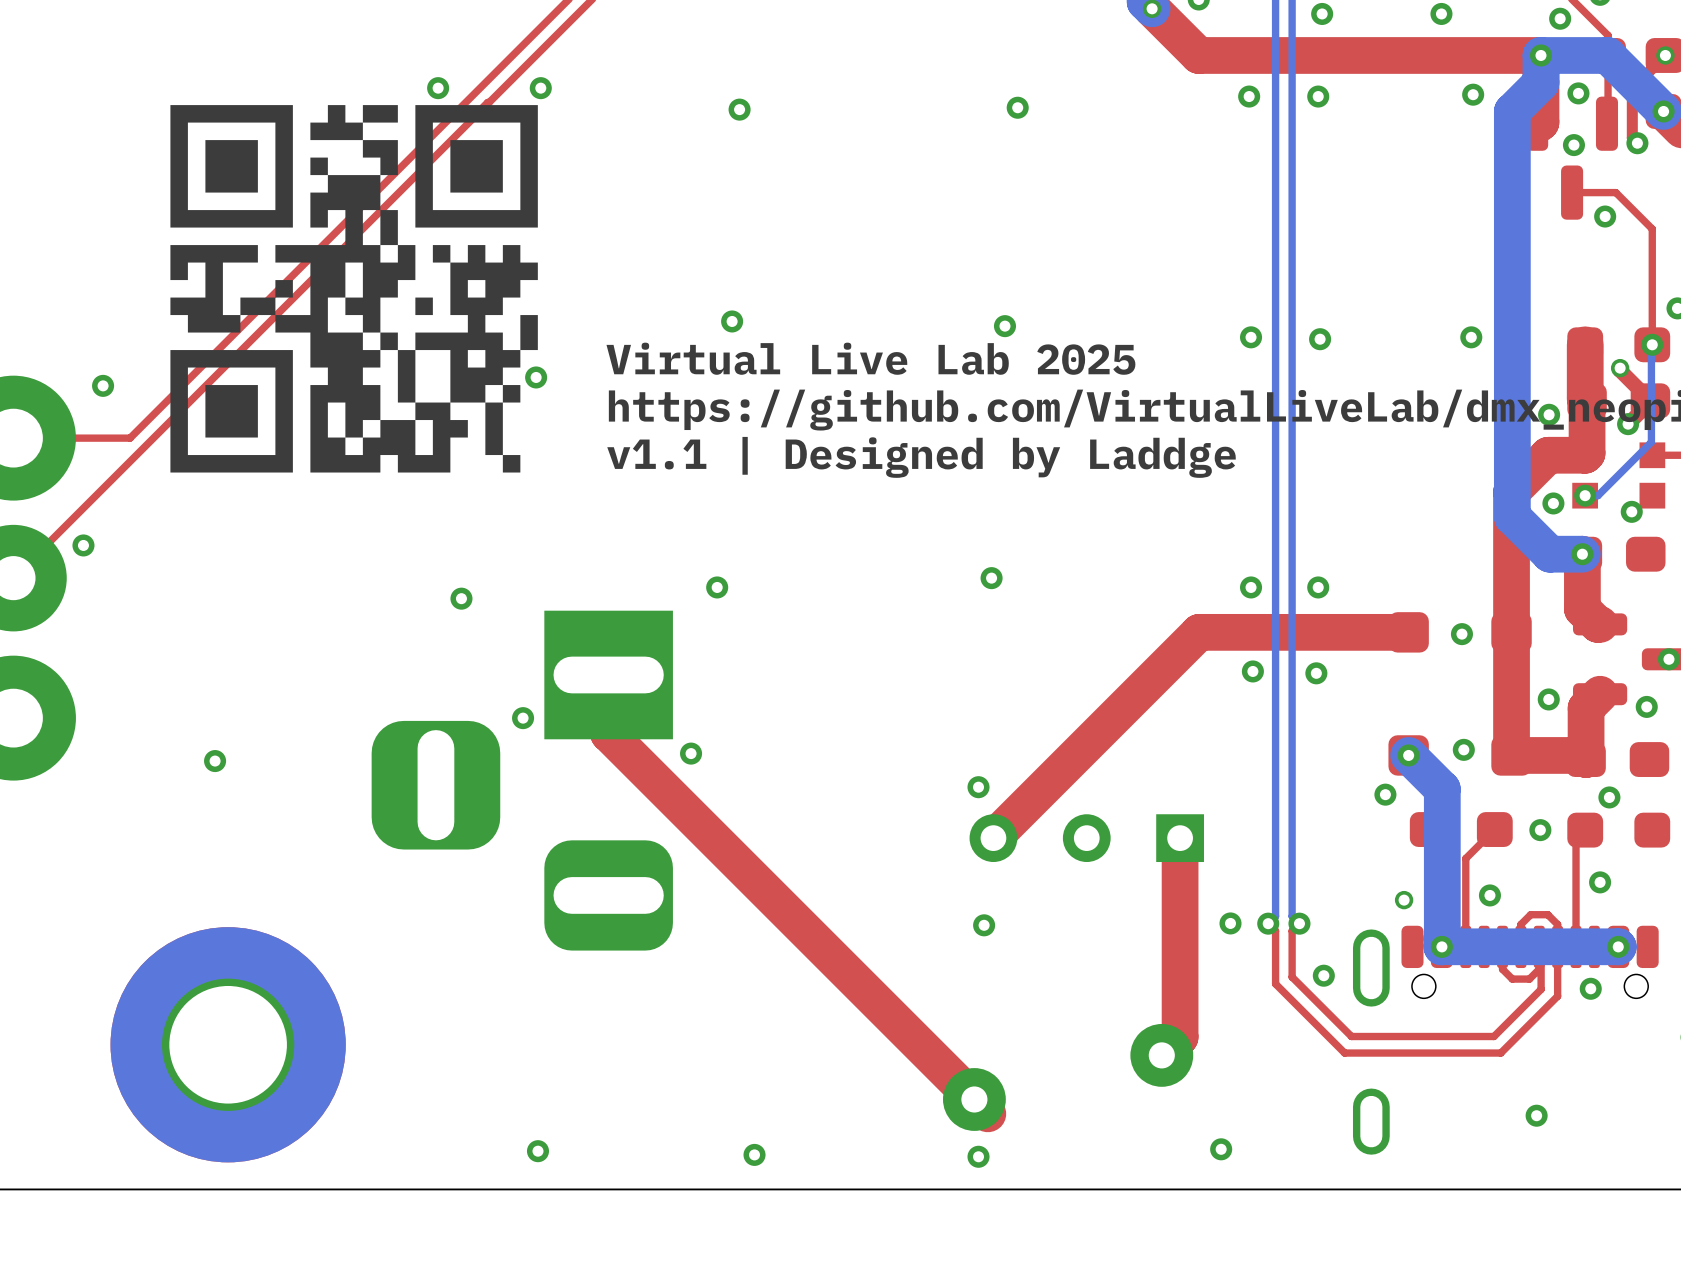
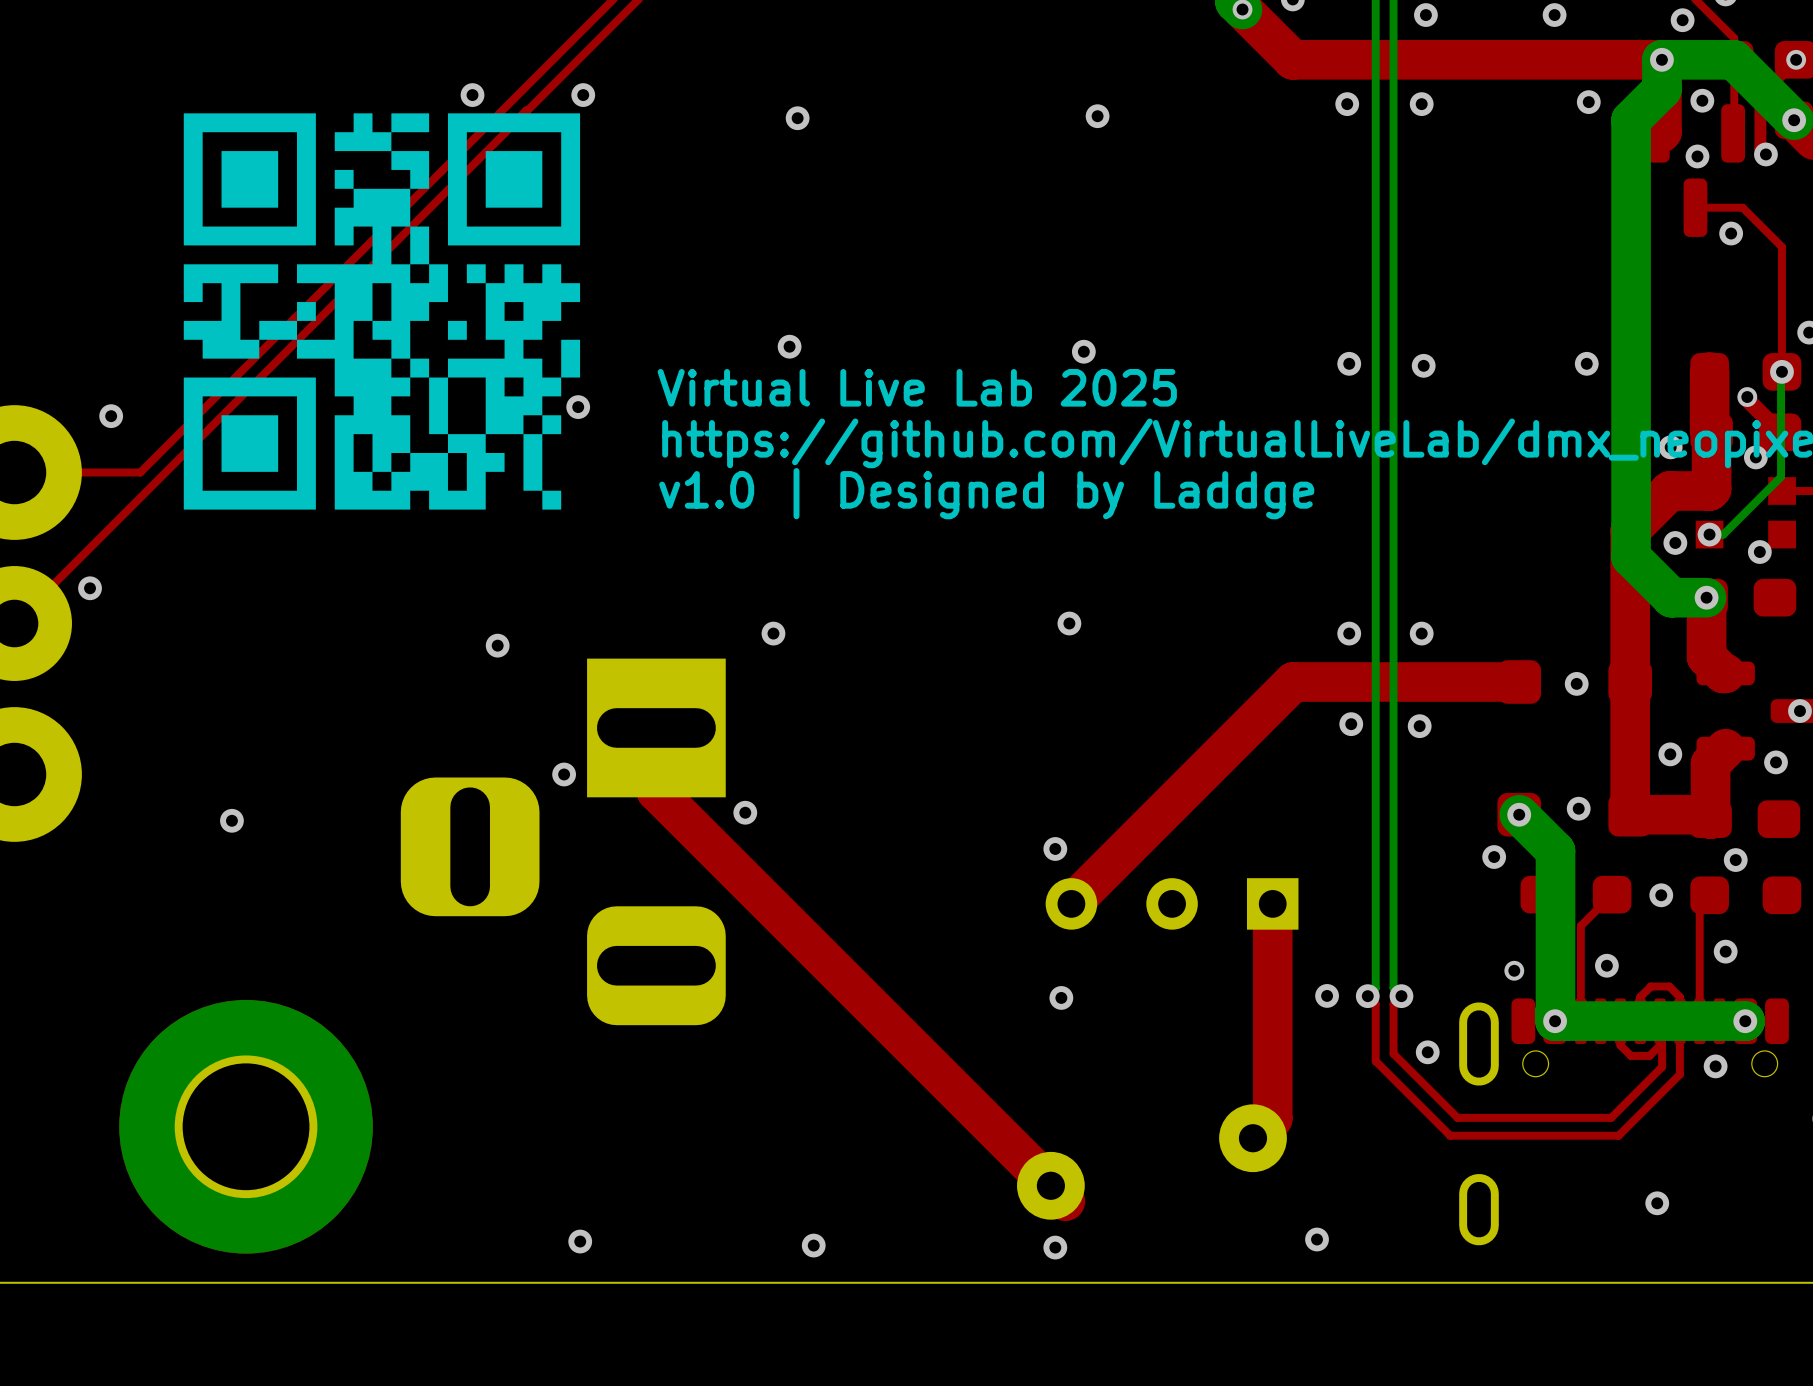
text: v1.1 | Designed by Laddge (921, 457) -> v1.0 | Designed by Laddge (986, 493)

